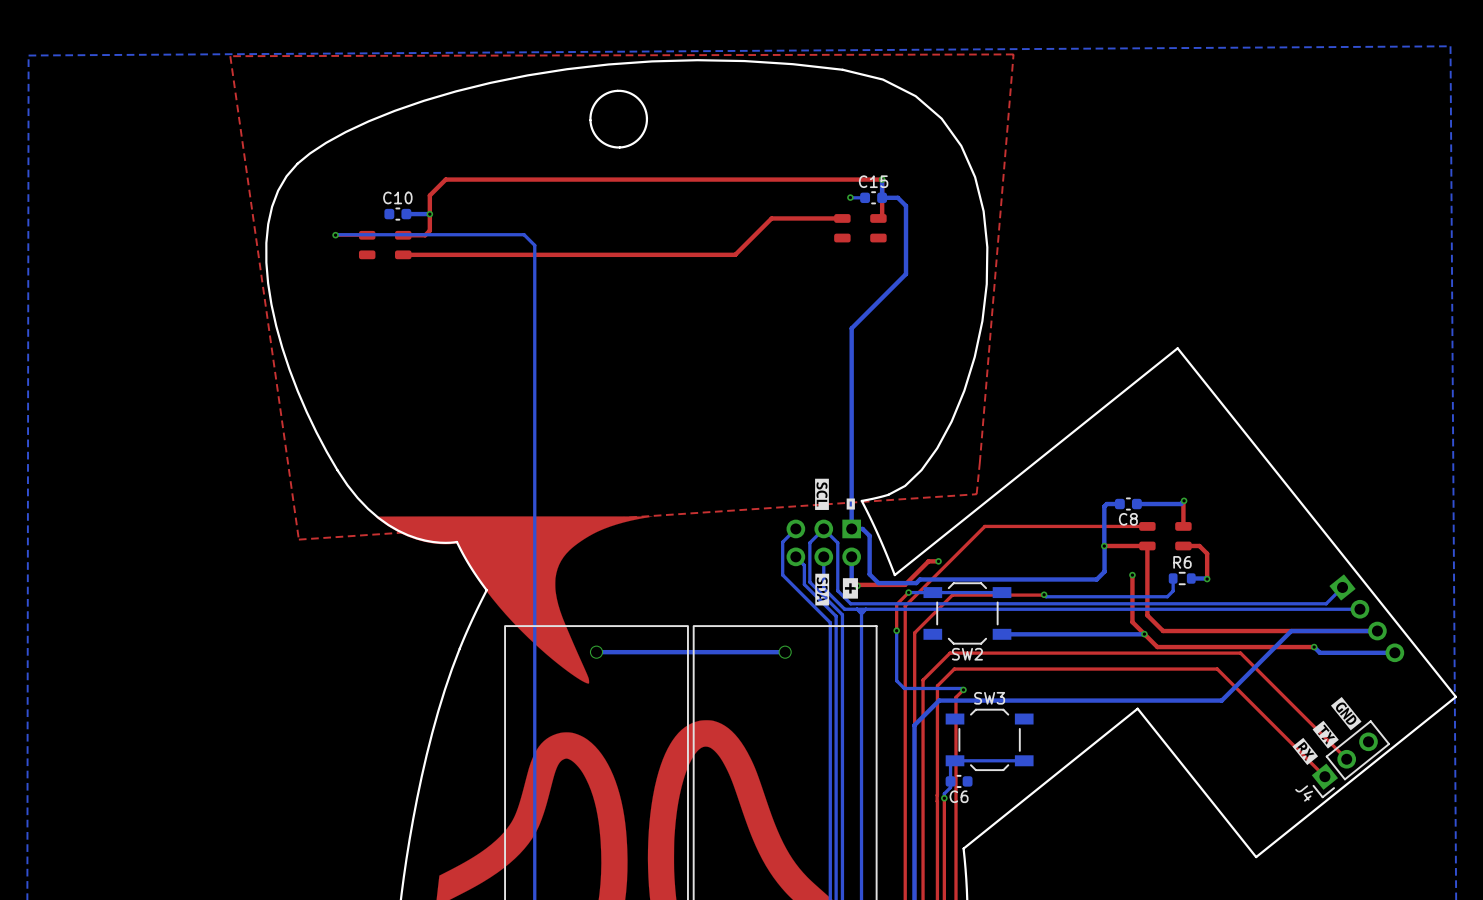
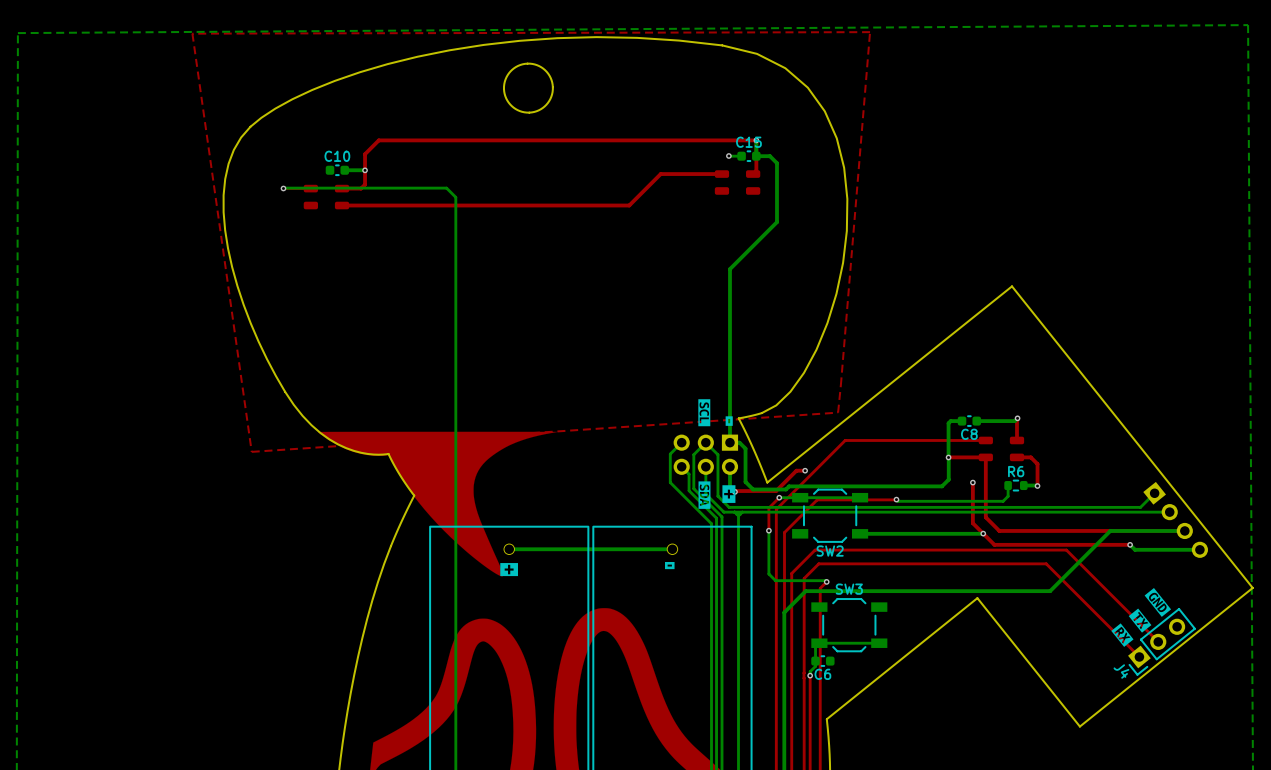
drawing: none -> [665, 561, 675, 570]
drawing: none -> [500, 563, 518, 577]

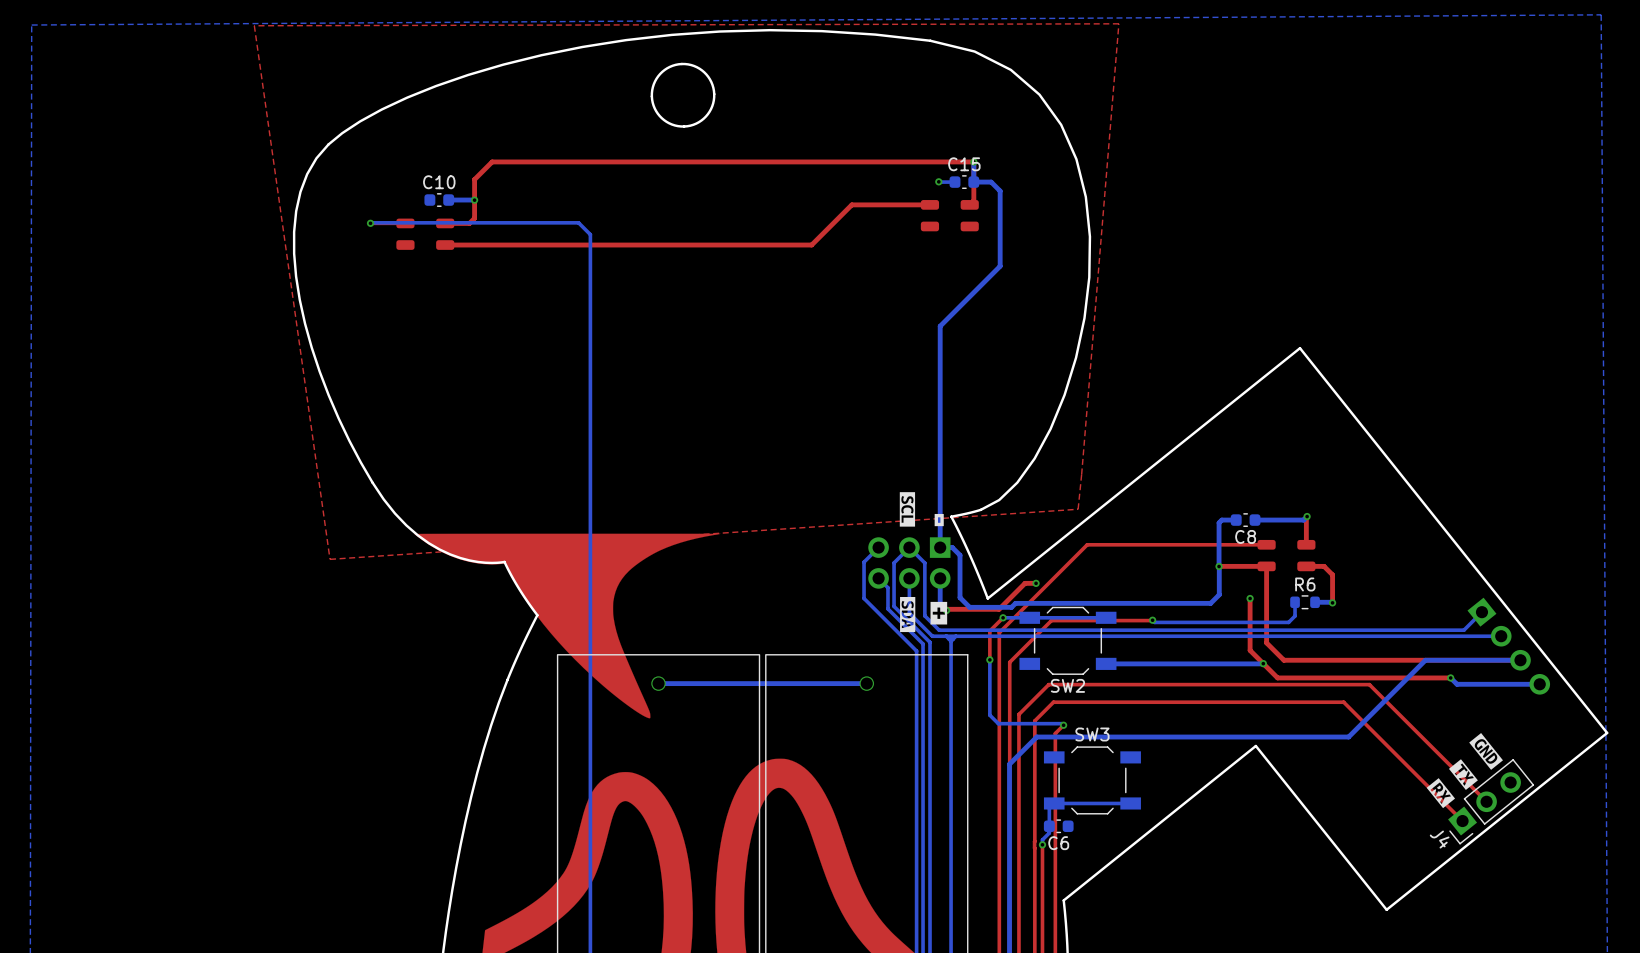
drawing: [665, 561, 675, 570] -> none
drawing: [500, 563, 518, 577] -> none

